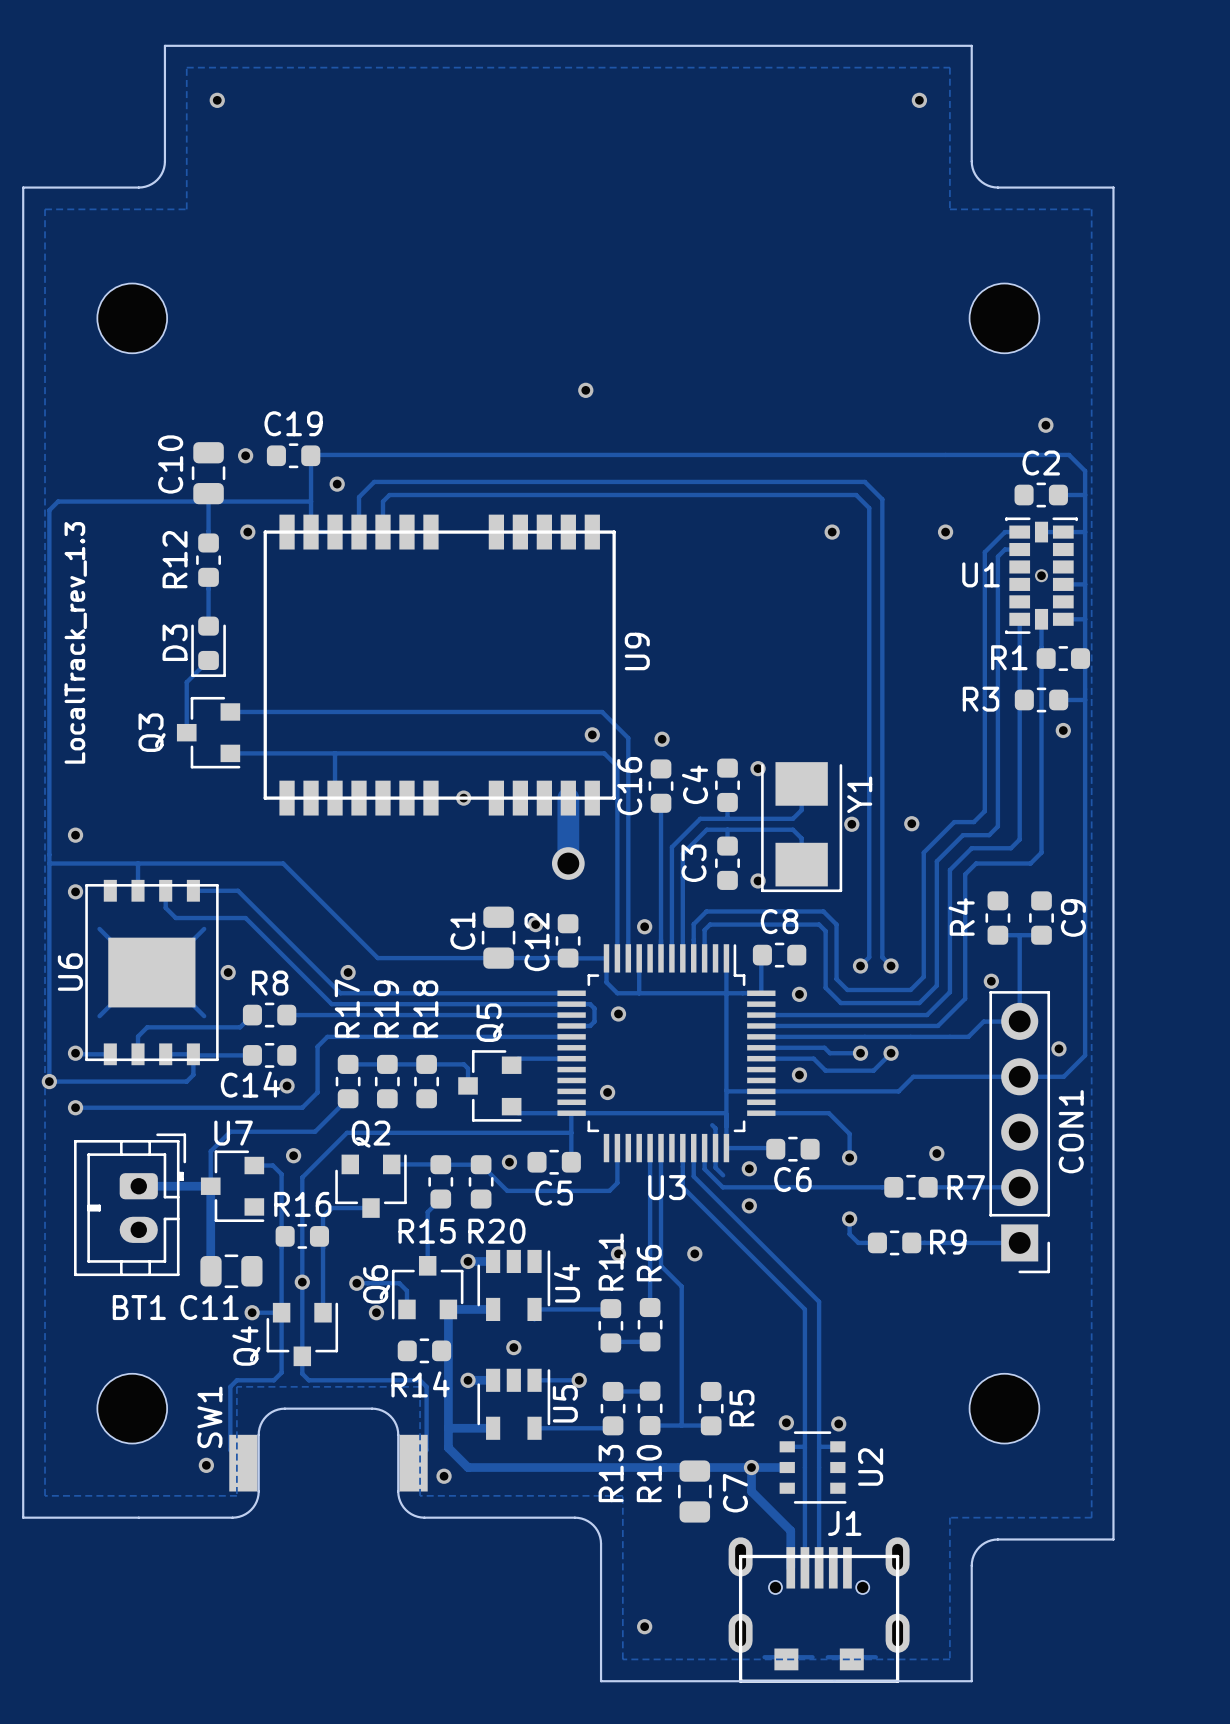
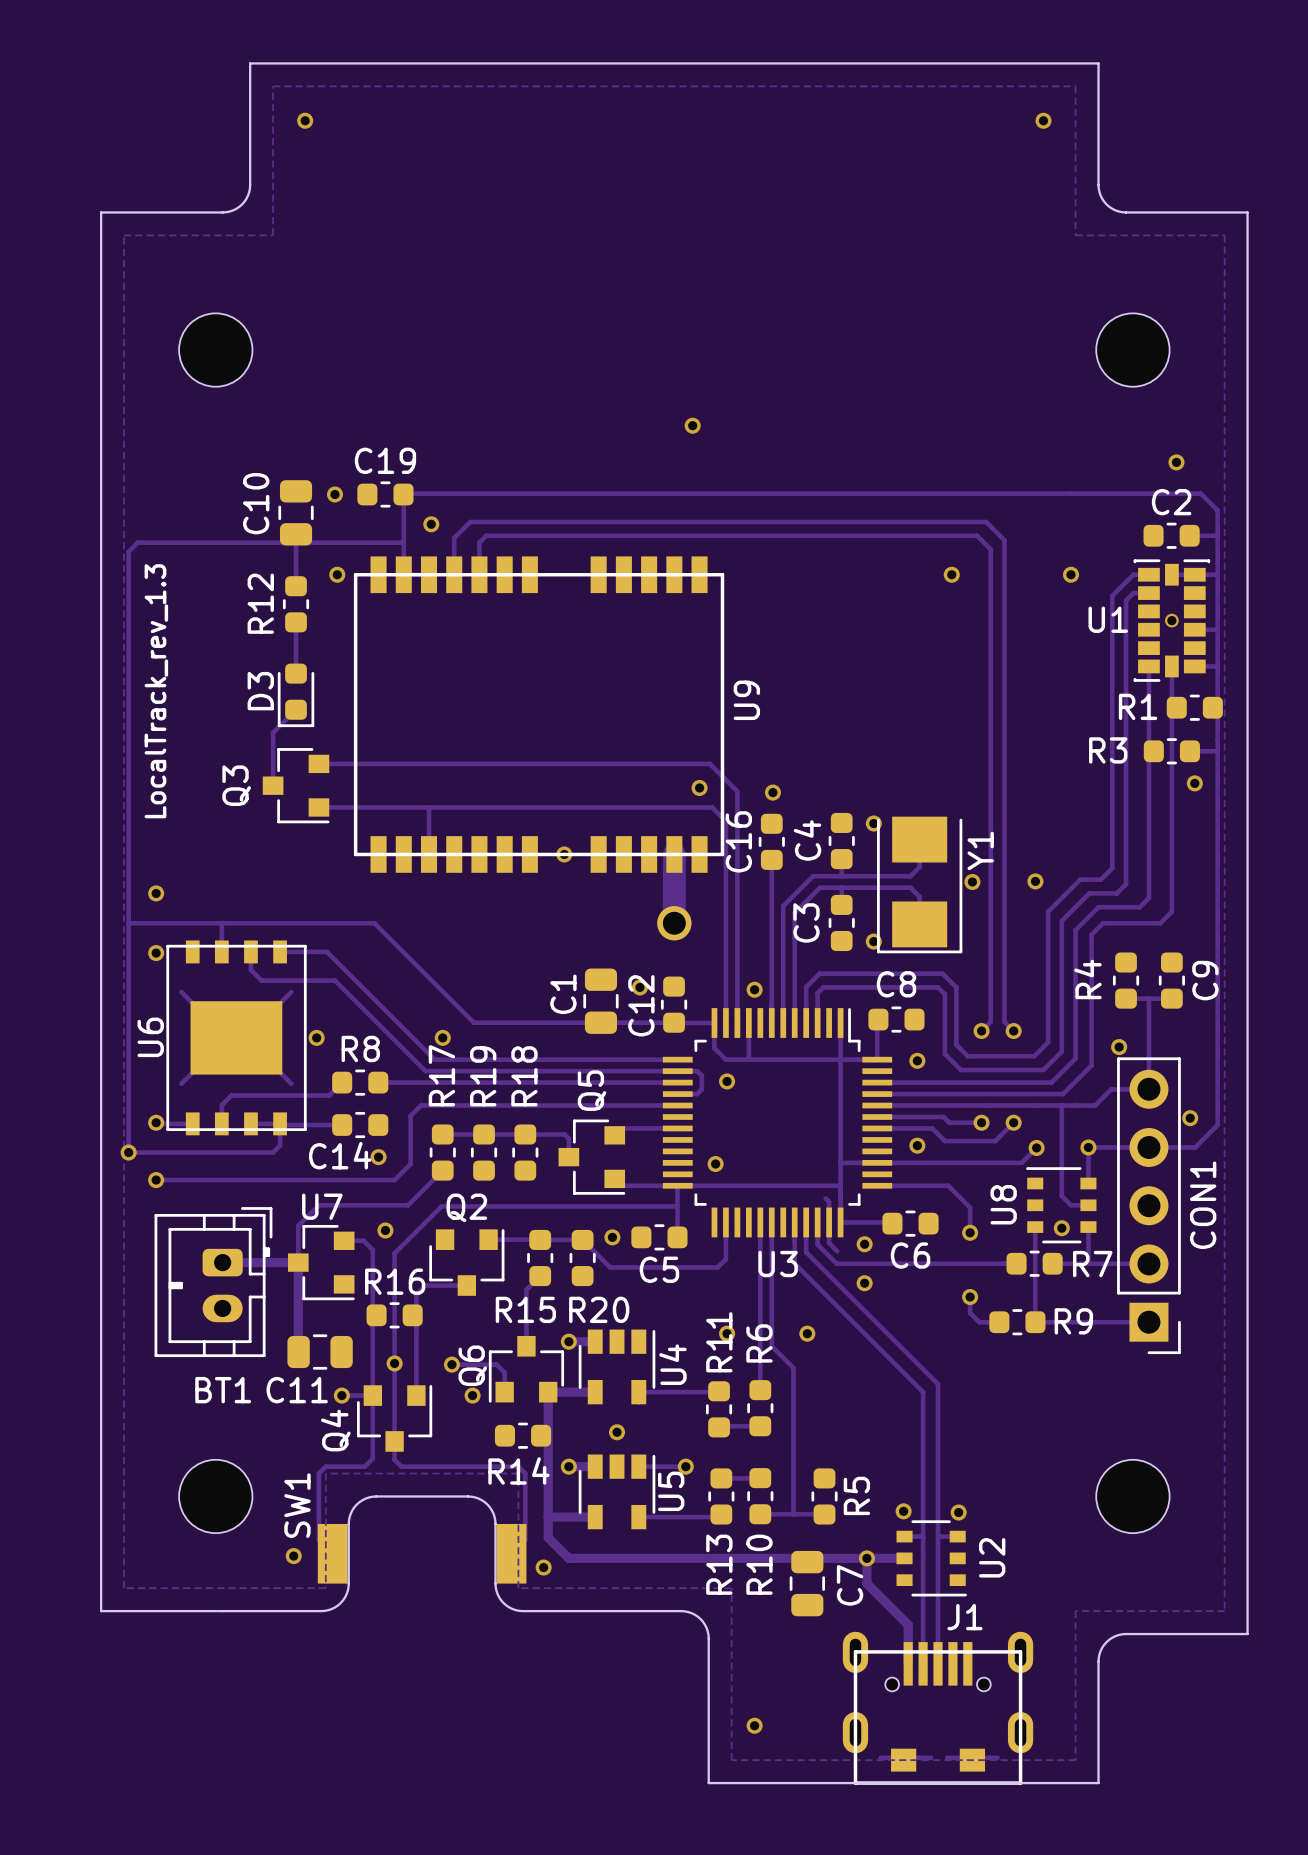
track: none -> (1061, 1105) (1061, 1196) (1071, 1205) (1088, 1205)
track: (962, 1076) (912, 1077) -> (1088, 1147) (1088, 1183)
via: none -> (1088, 1147)
via: none -> (1036, 1147)
U8: none -> (1061, 1205)
track: none -> (1035, 1227) (1035, 1321)
track: none -> (1088, 1227) (1087, 1263)

